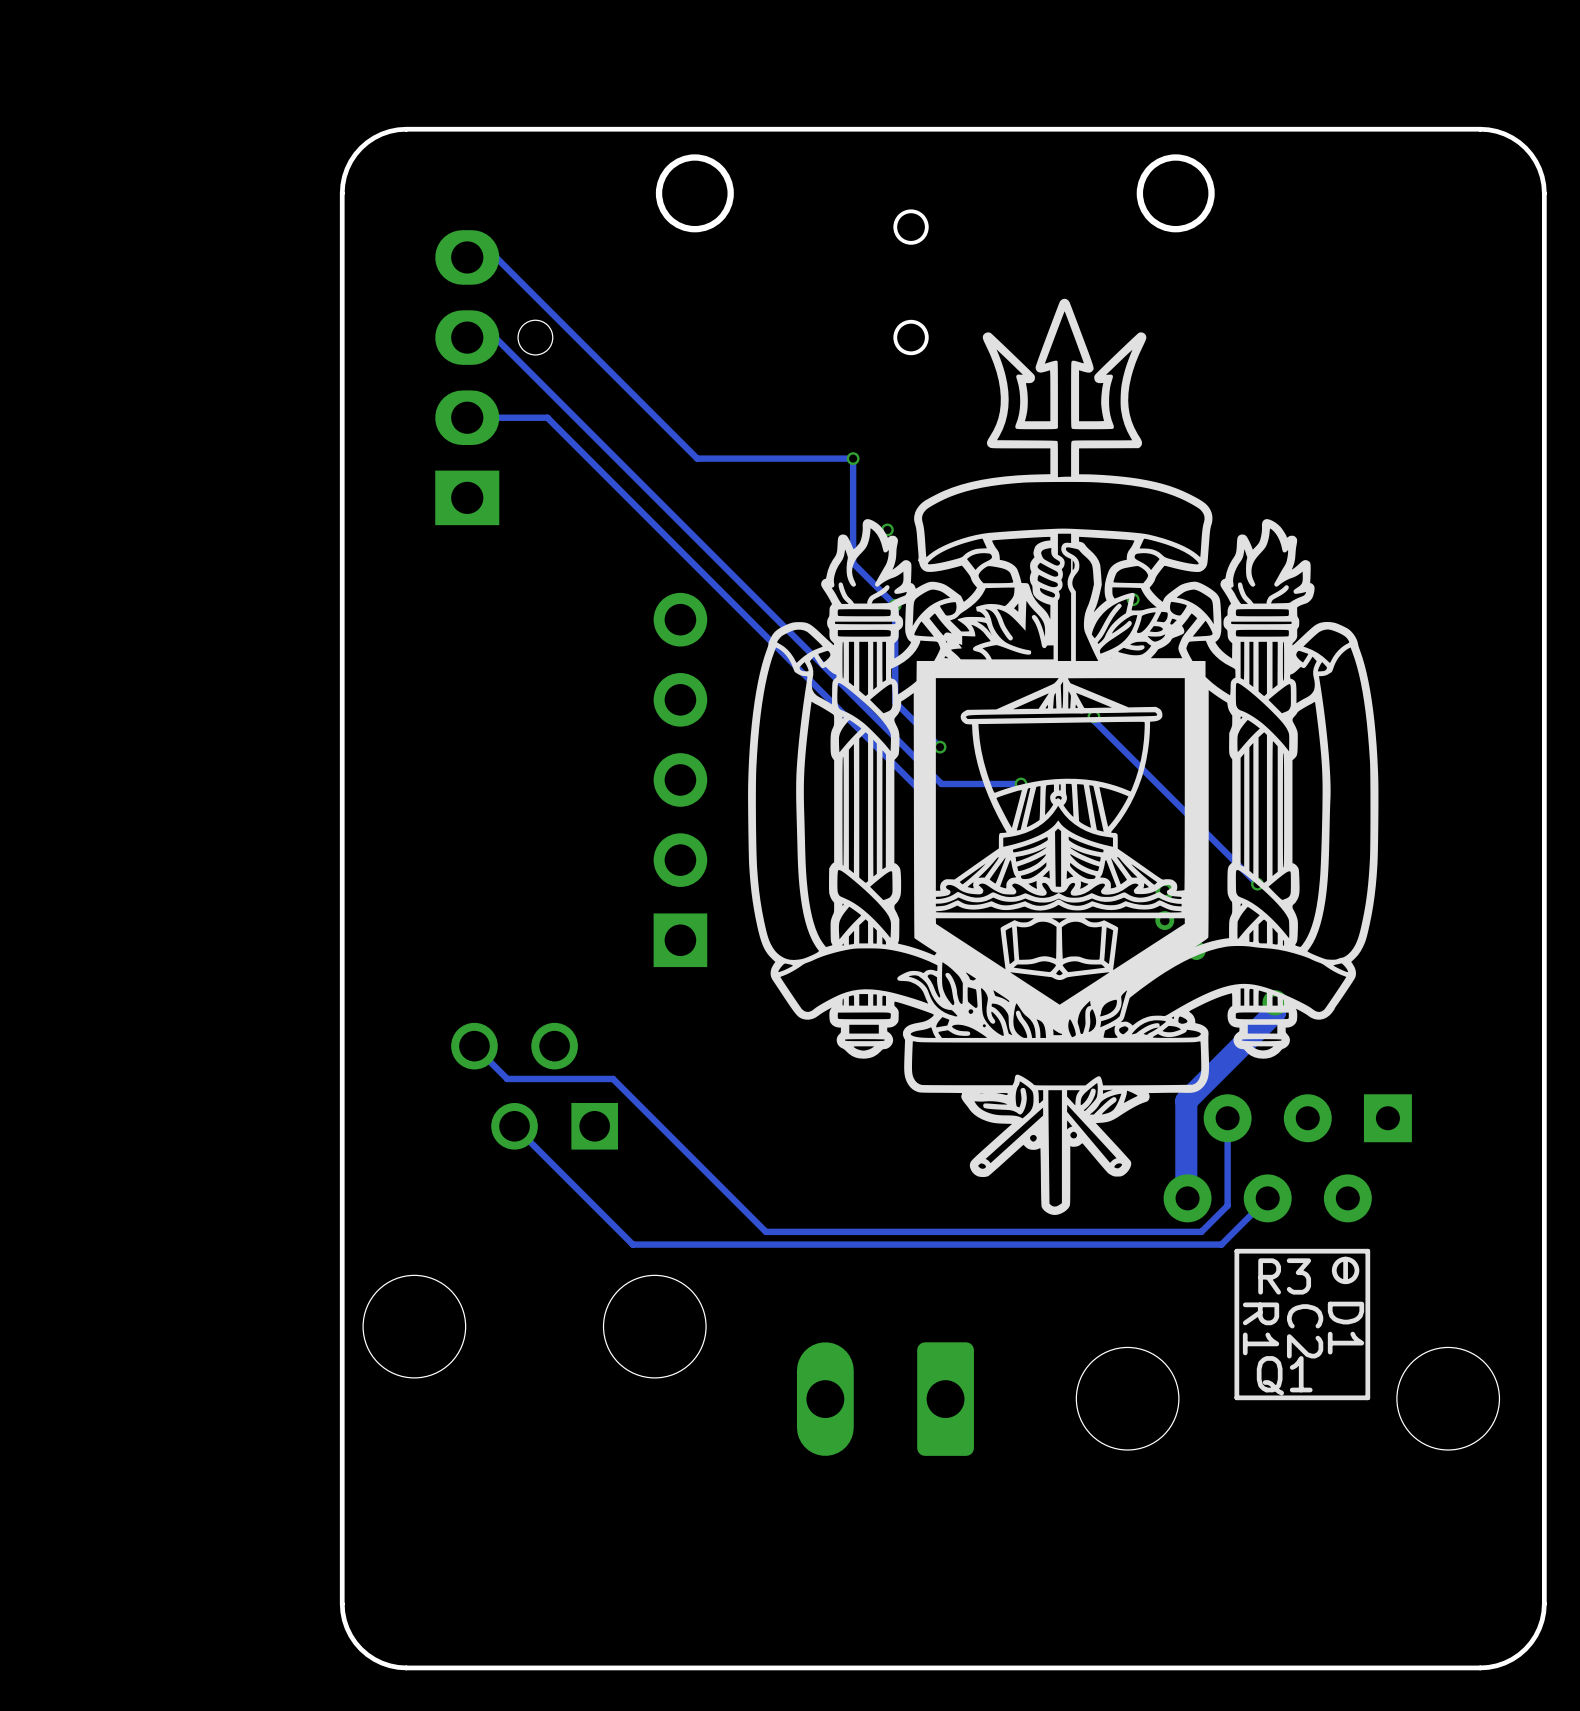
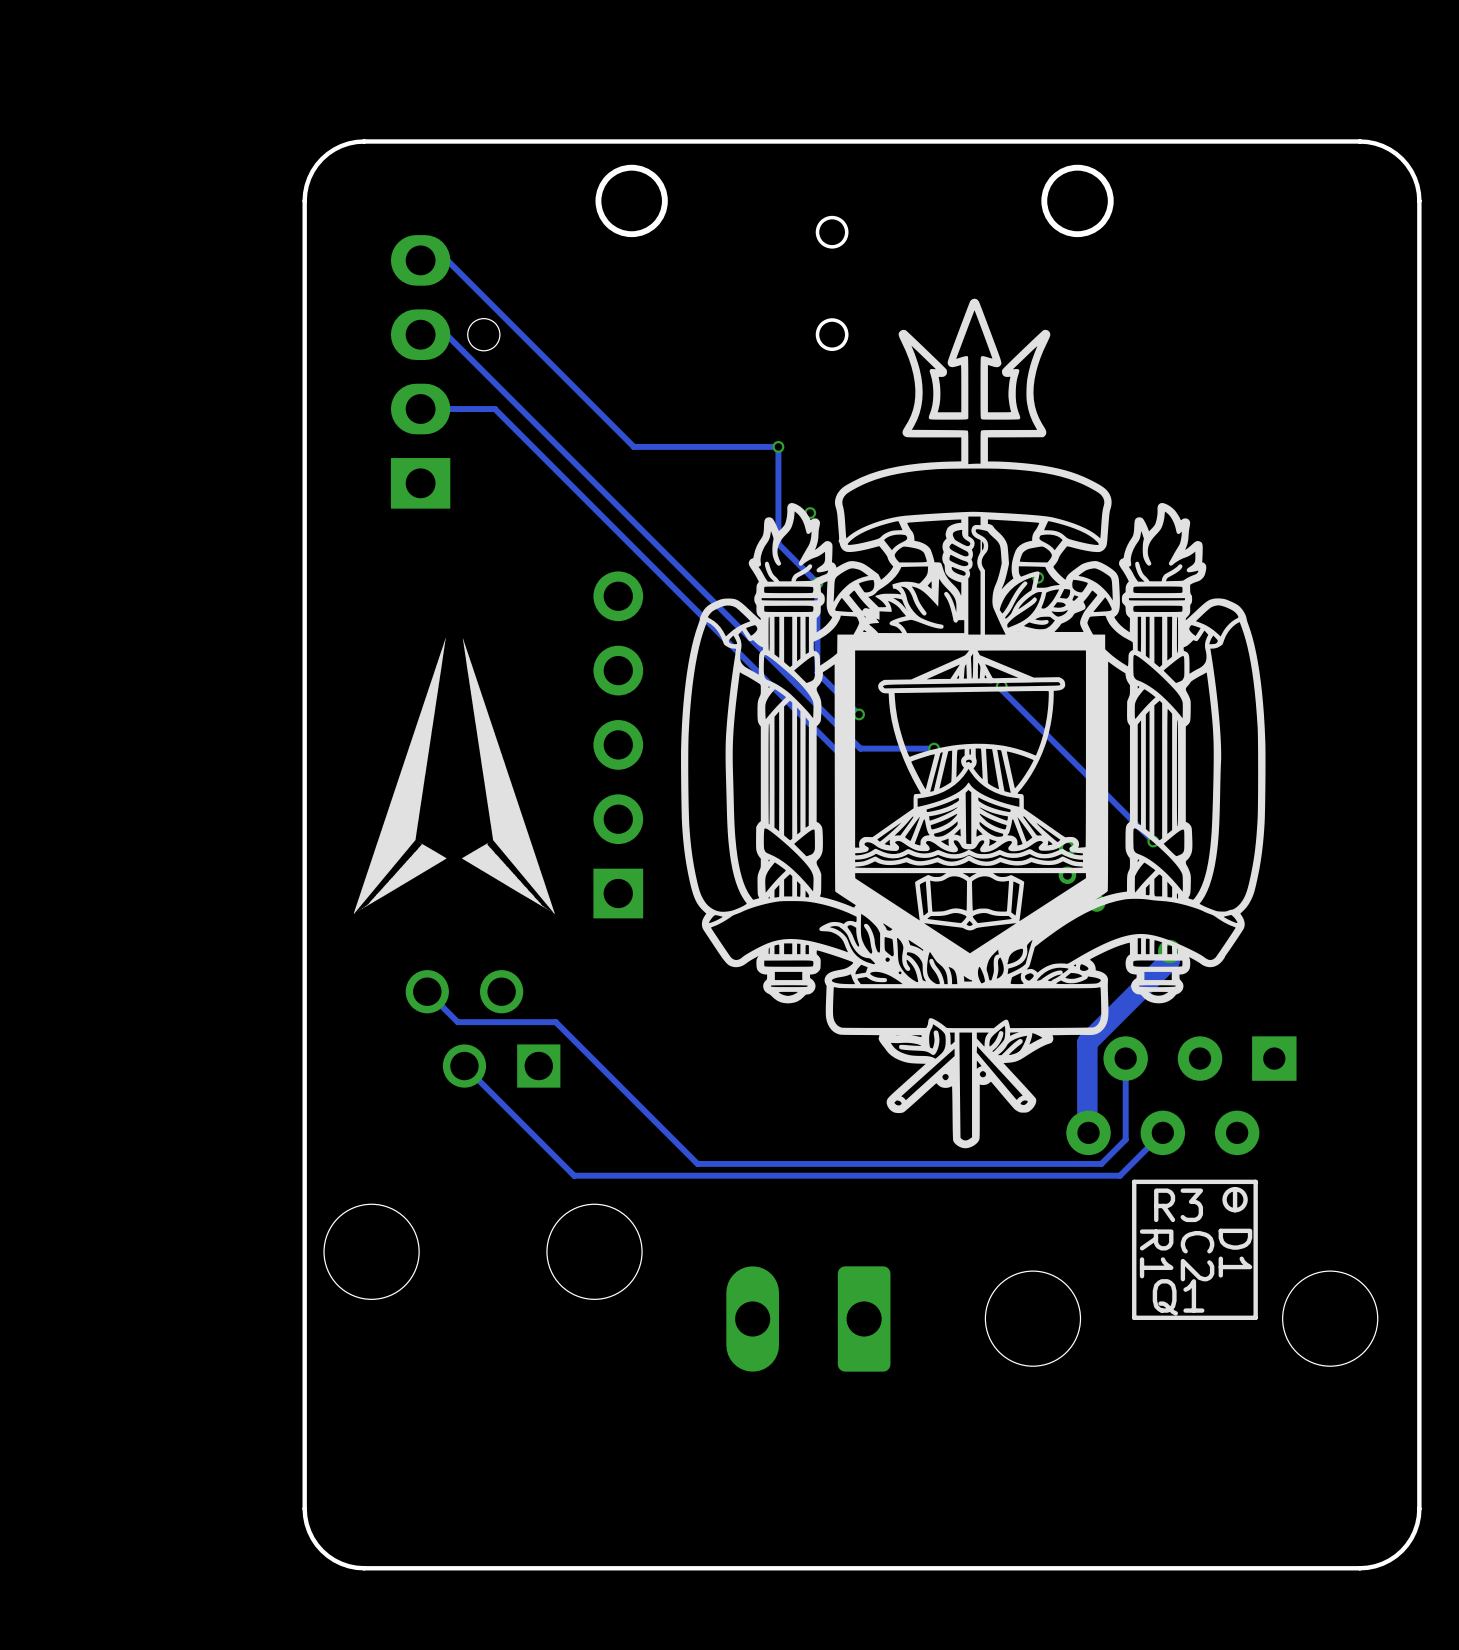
drawing: none -> [353, 637, 555, 914]

